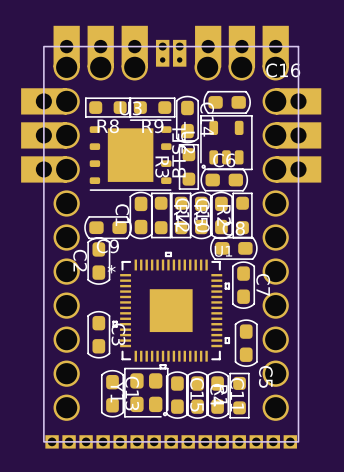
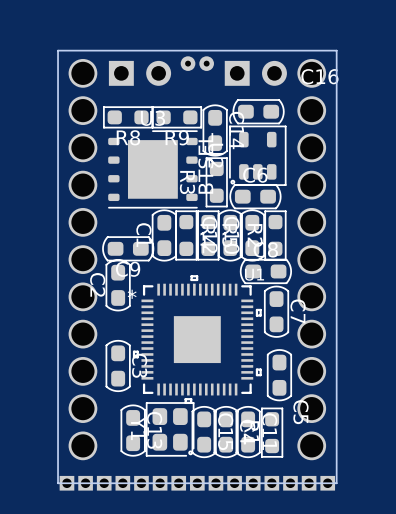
board edge: none -> (336, 50) (58, 50) (58, 483) (336, 483) (336, 50)
part: none -> (197, 63)
part: none -> (140, 73)
part: none -> (255, 73)
part: none -> (82, 259)
part: (171, 237) -> none
part: none -> (311, 259)

